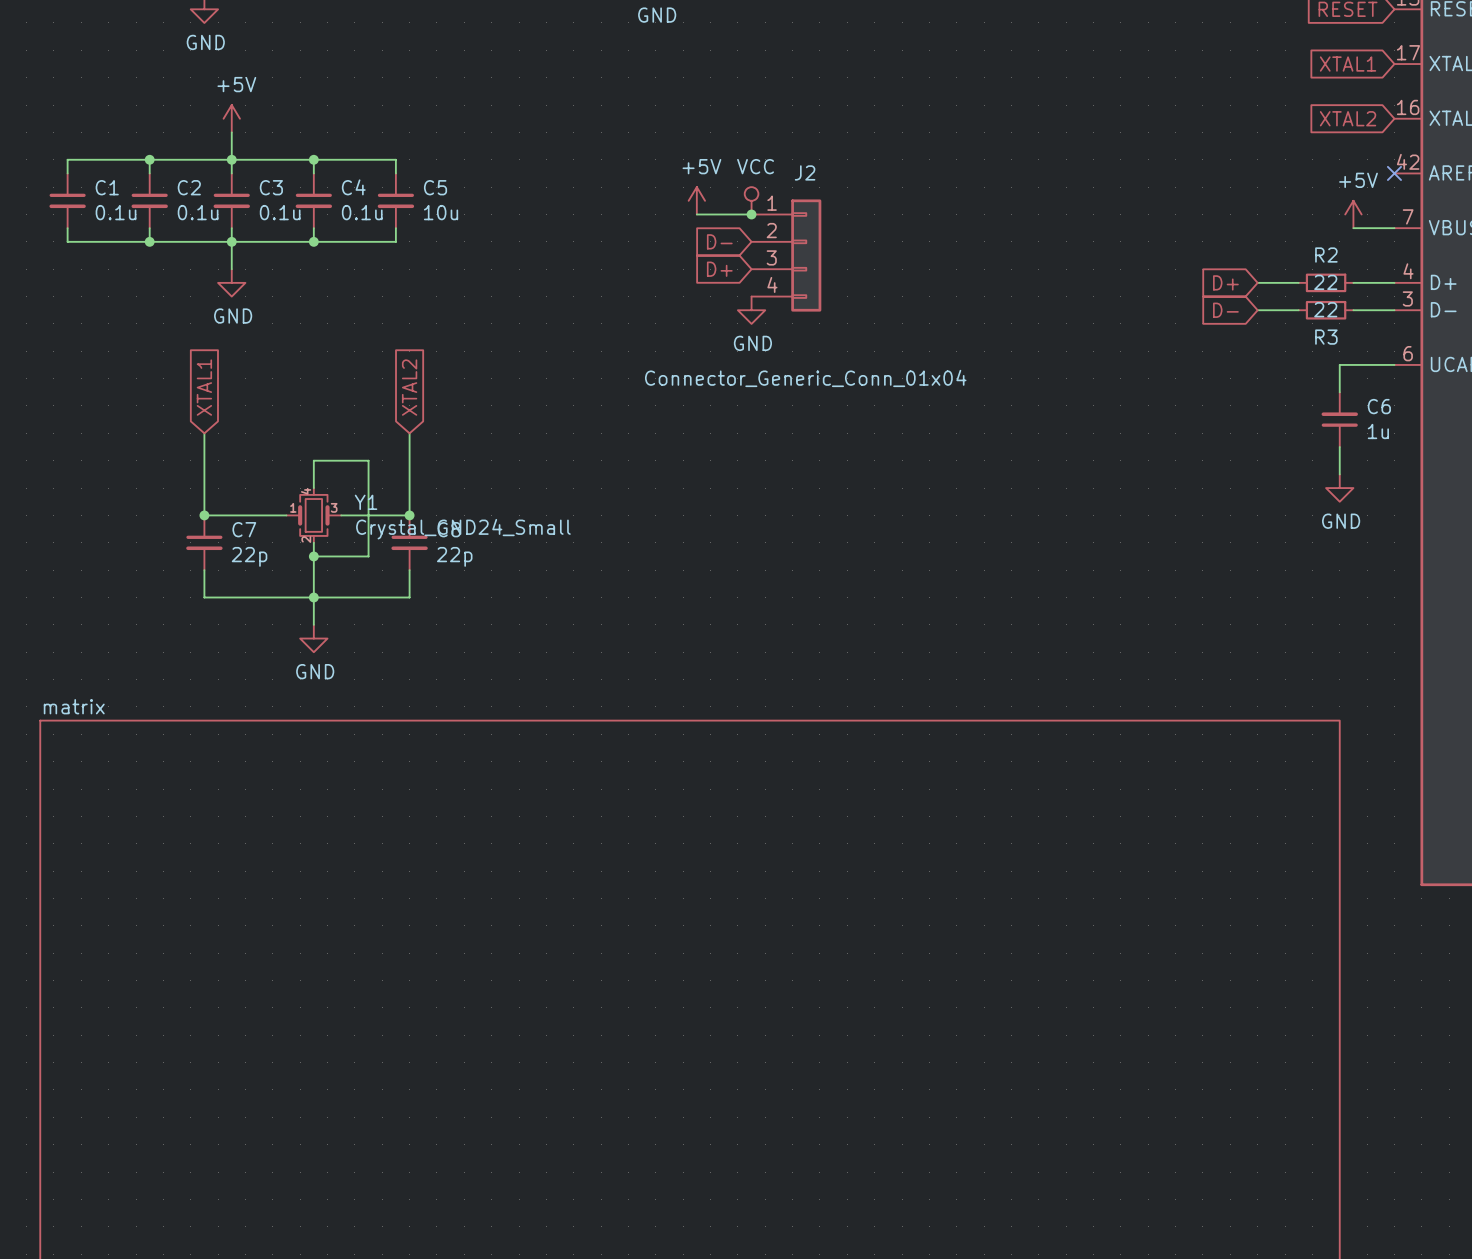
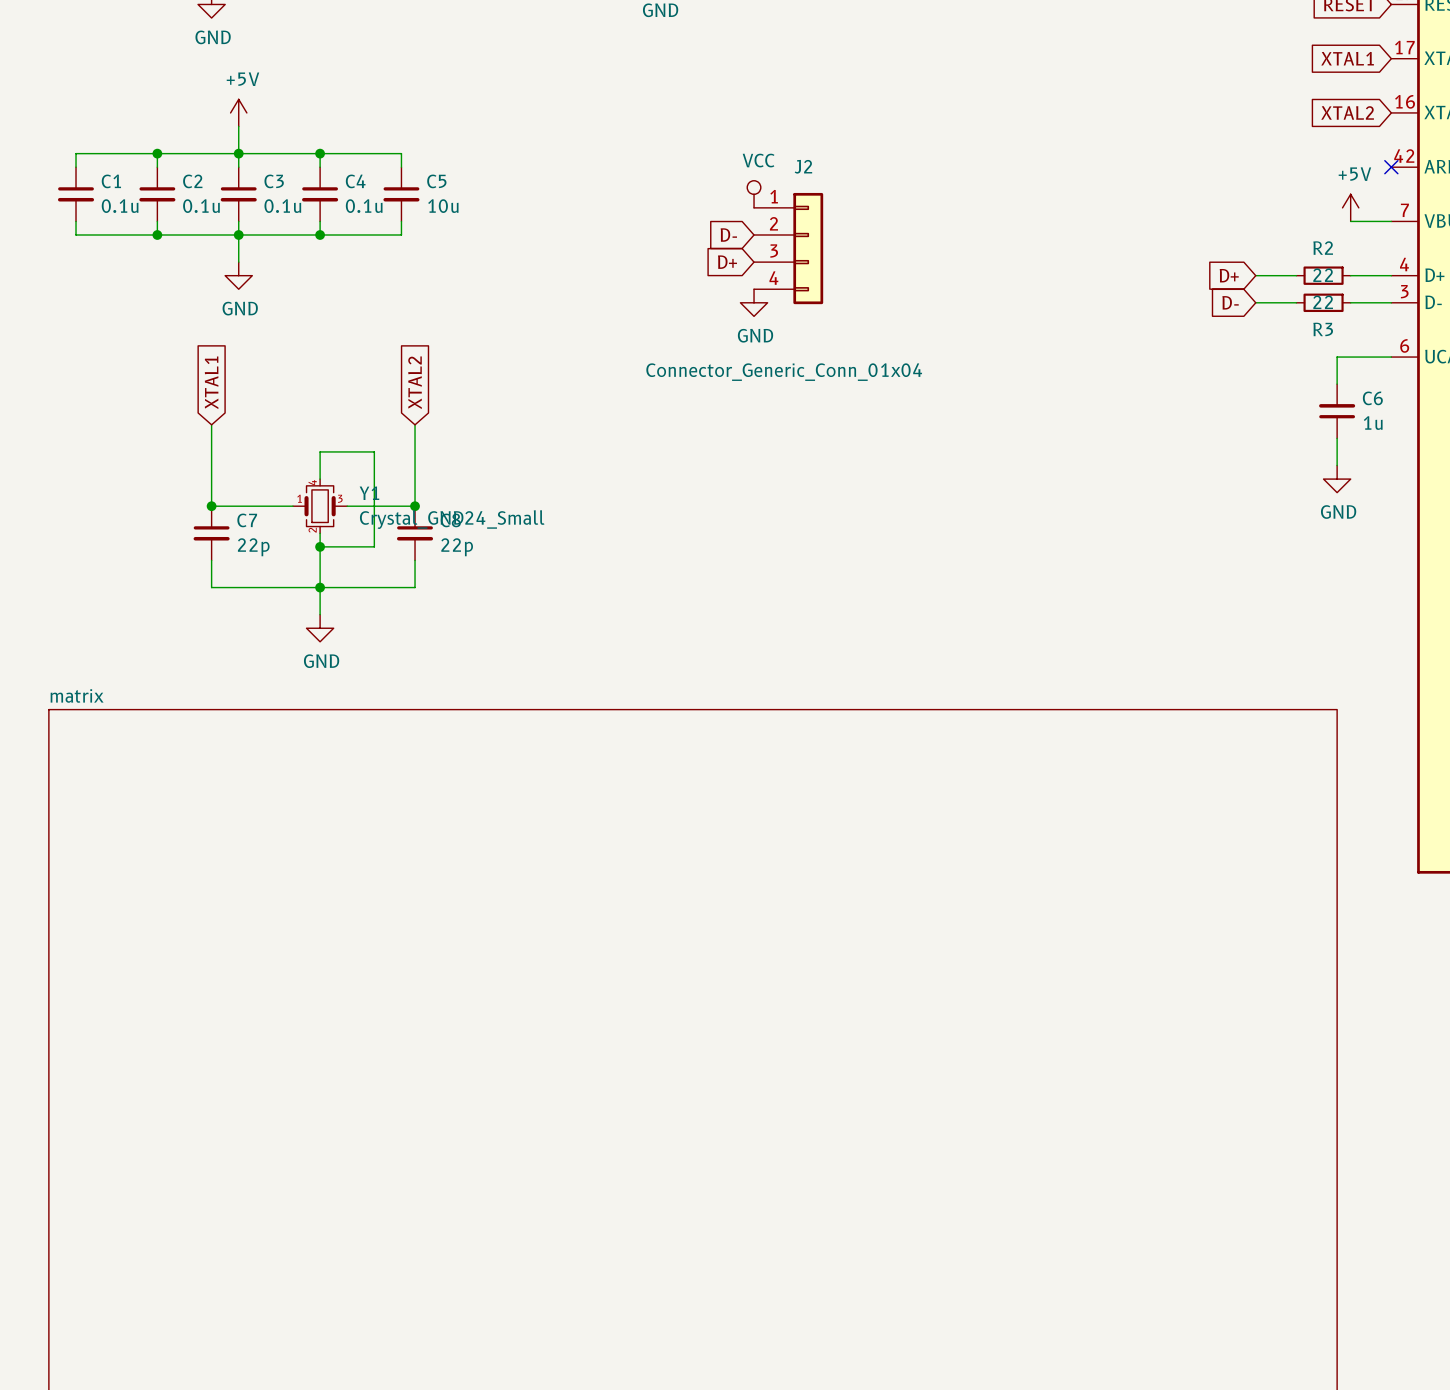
power symbol: +5V (696, 200) -> none
wire: (696, 214) (751, 214) -> none
junction: (751, 214) -> none

